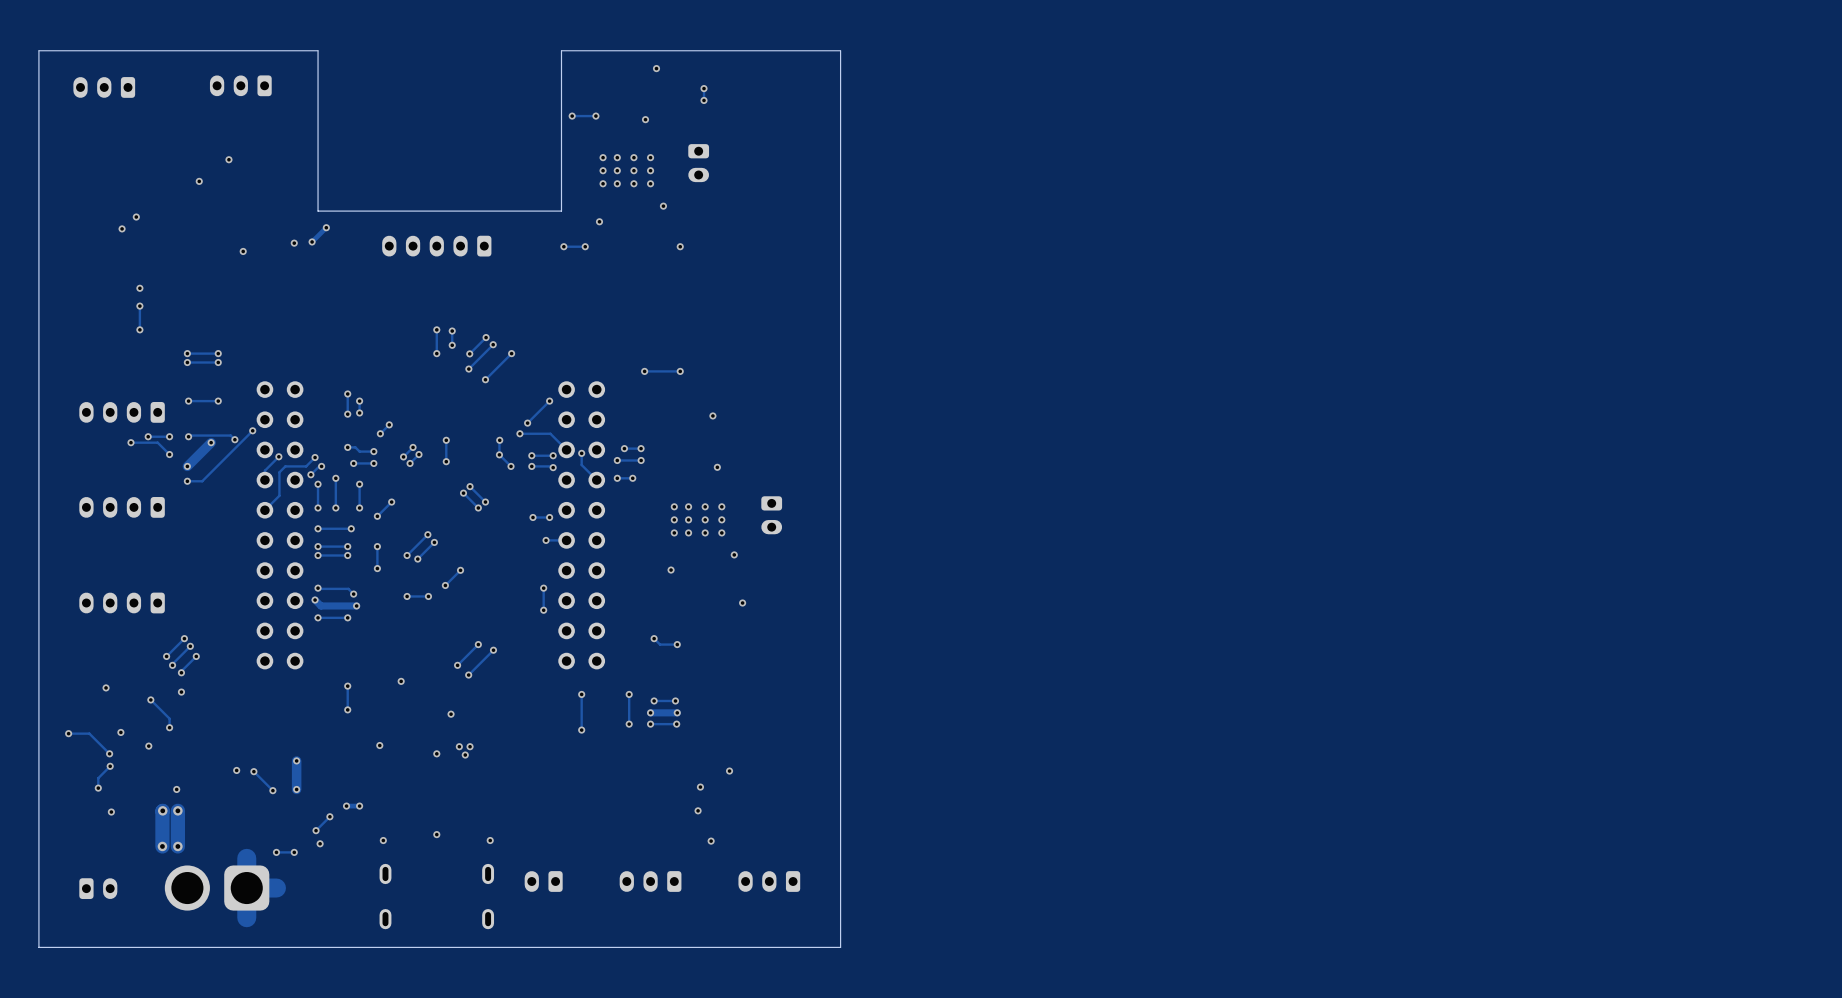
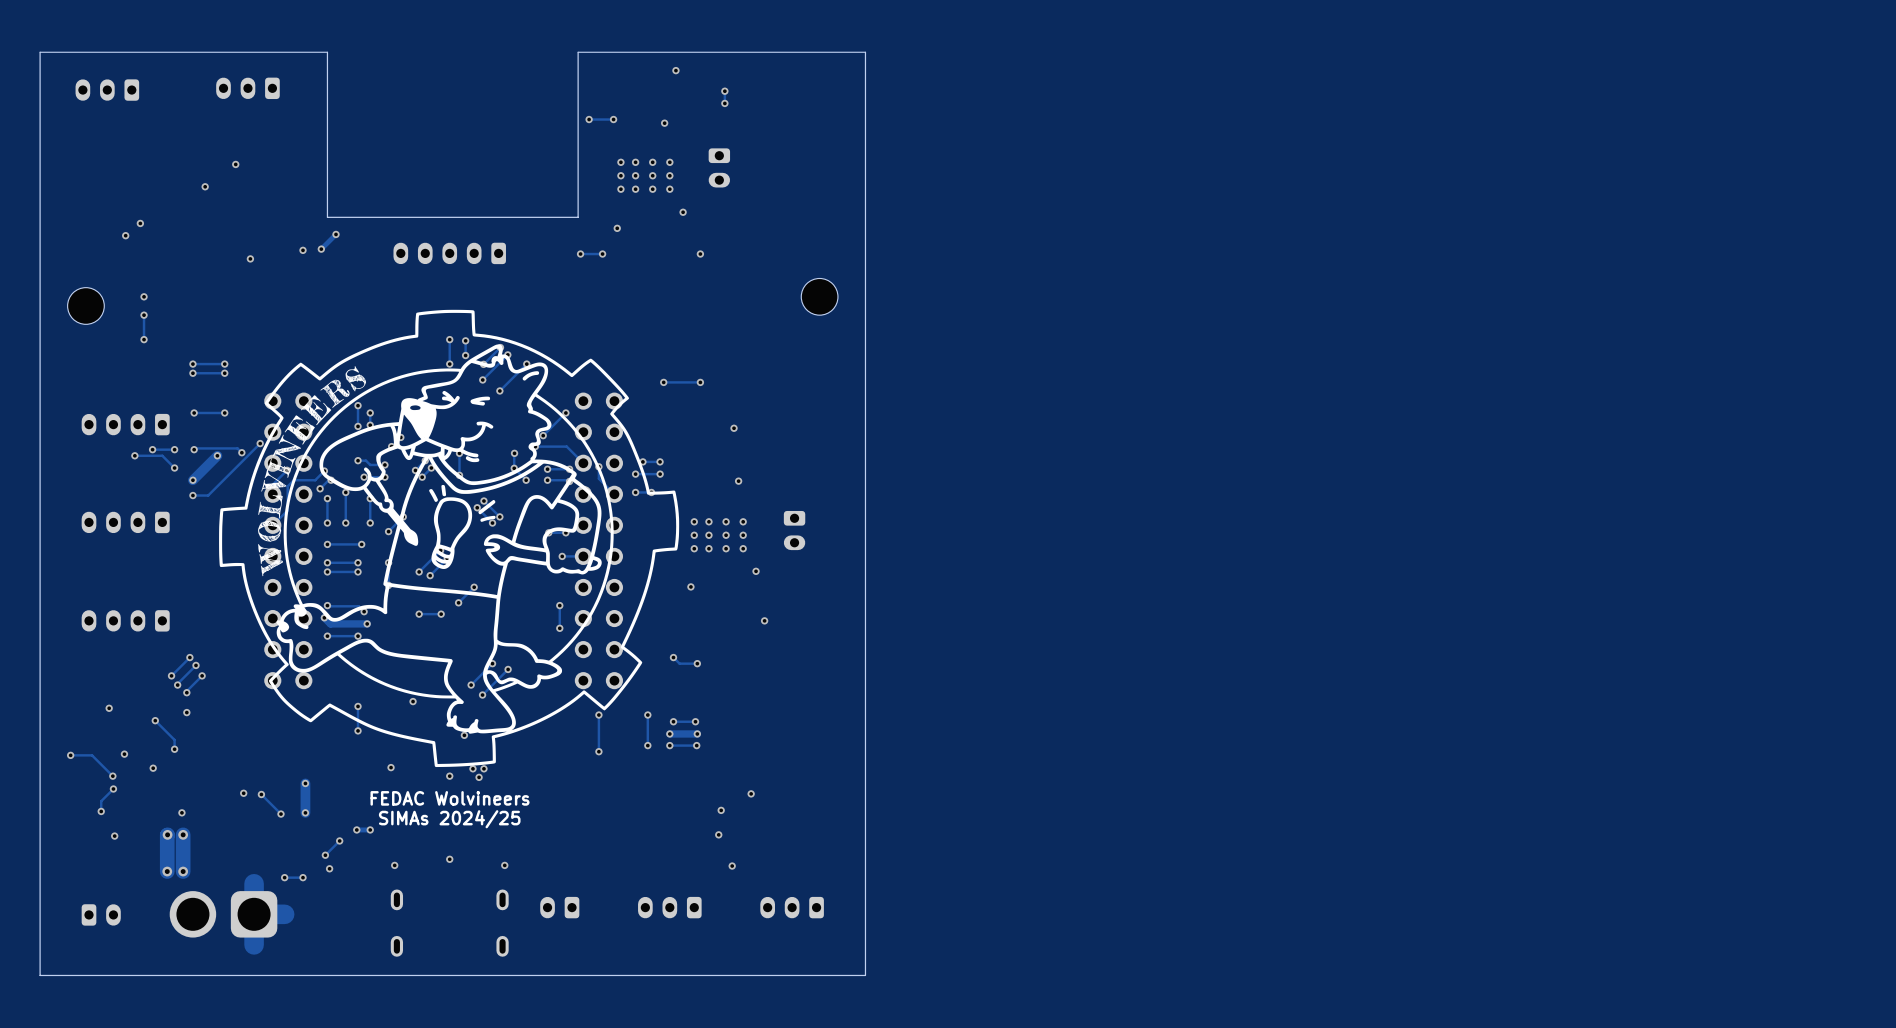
part: none -> (819, 296)
part: none -> (85, 305)
drawing: none -> [219, 309, 680, 768]
text: none -> FEDAC Wolvineers (450, 798)
text: none -> SIMAs 2024/25 (449, 819)

